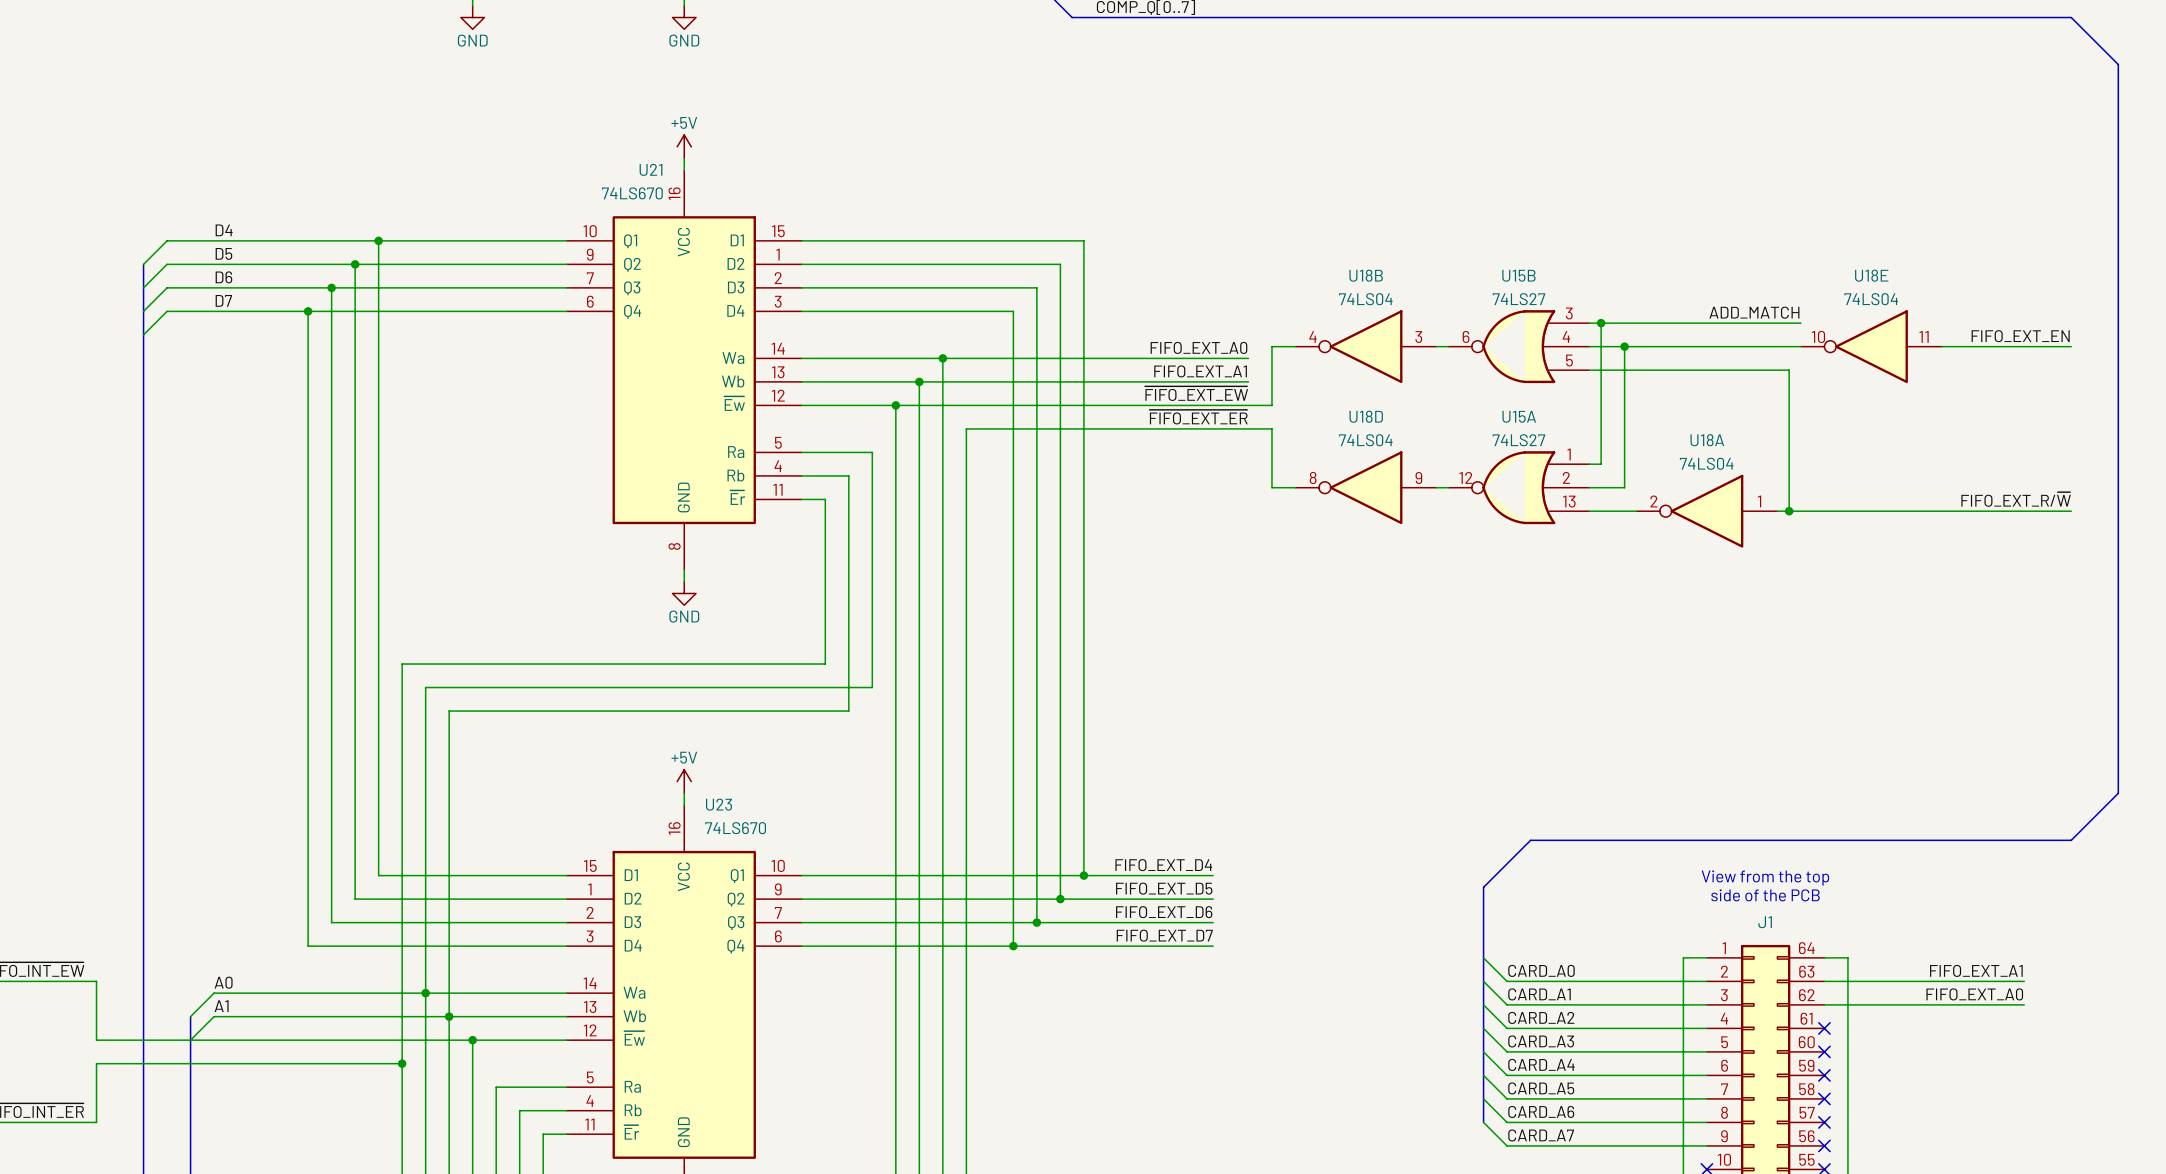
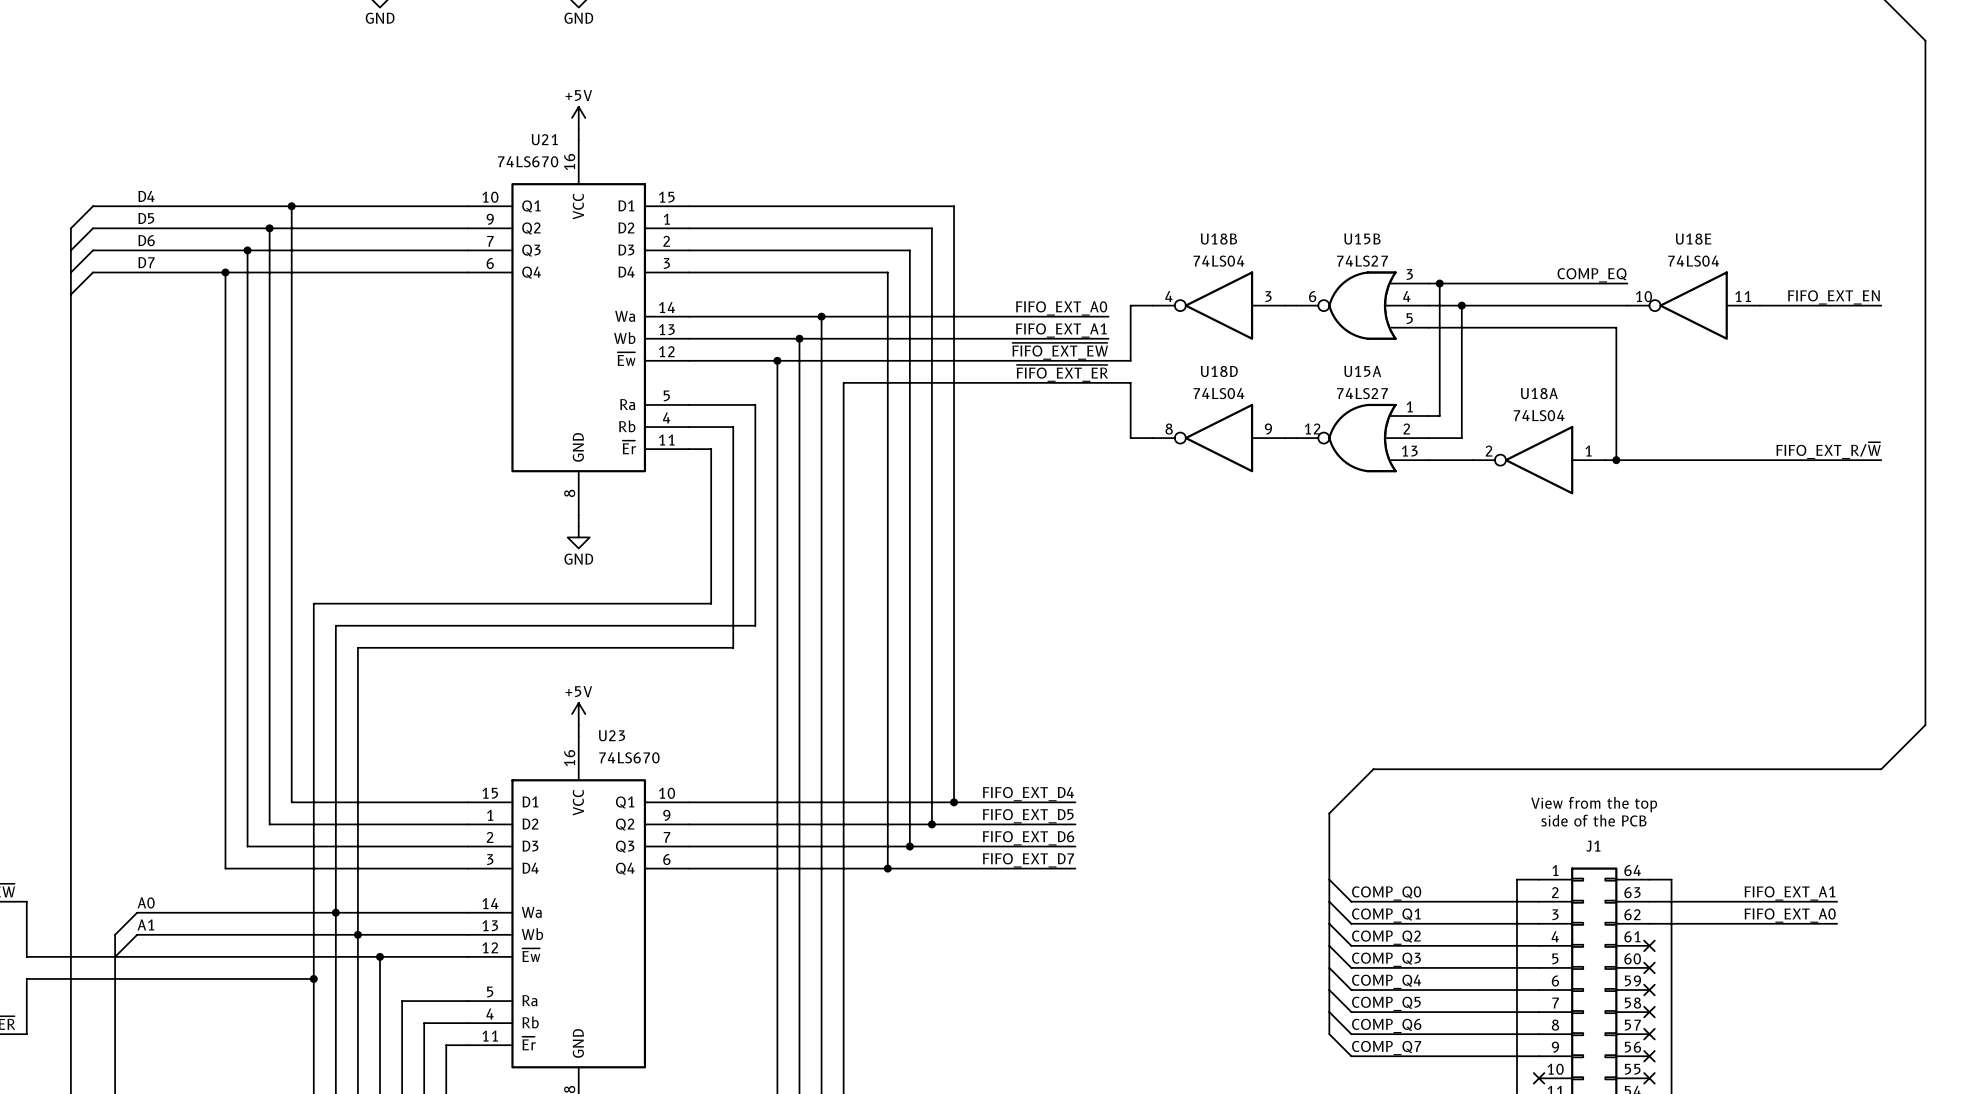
label: ADD_MATCH (1754, 312) -> COMP_EQ (1592, 275)
label: CARD_A0 (1541, 970) -> COMP_Q0 (1386, 893)
label: CARD_A1 (1539, 994) -> COMP_Q1 (1386, 915)
label: CARD_A2 (1541, 1017) -> COMP_Q2 (1386, 937)
label: CARD_A3 (1541, 1041) -> COMP_Q3 (1386, 959)
label: CARD_A4 (1541, 1064) -> COMP_Q4 (1386, 981)
label: CARD_A5 (1541, 1088) -> COMP_Q5 (1386, 1003)
label: CARD_A6 (1541, 1111) -> COMP_Q6 (1386, 1025)
label: CARD_A7 (1541, 1135) -> COMP_Q7 (1386, 1048)

